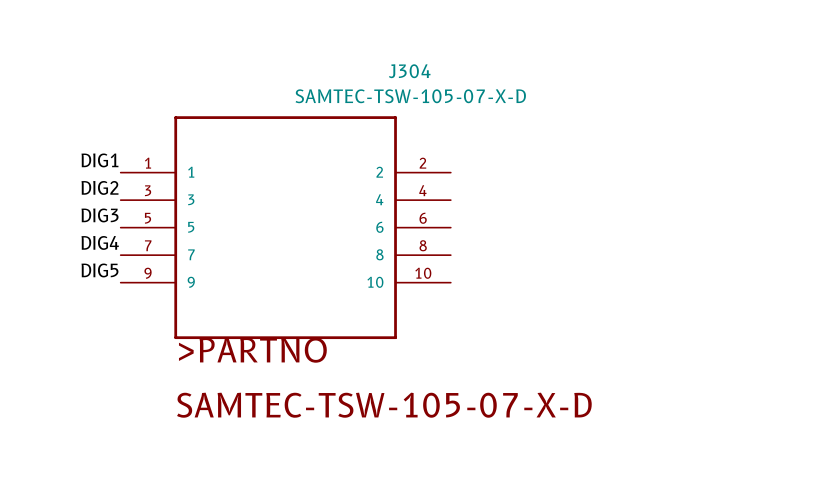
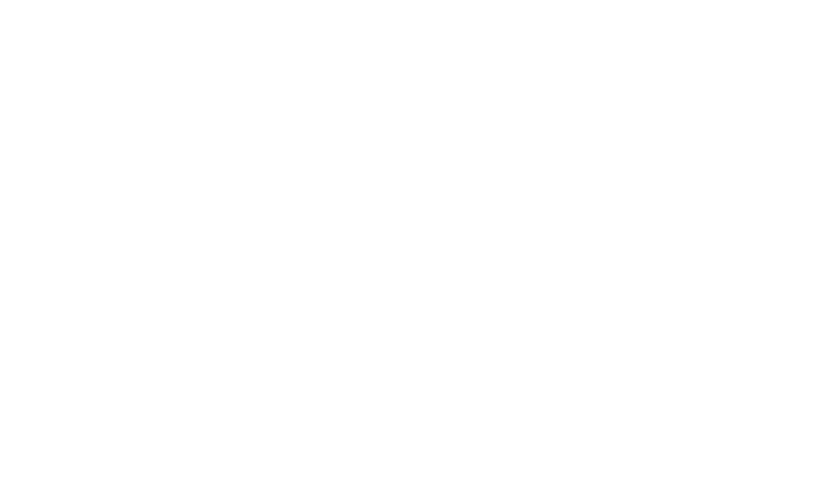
label: DIG1 (99, 160) -> none
label: DIG2 (100, 187) -> none
label: DIG3 (100, 215) -> none
J304: SAMTEC-TSW-105-07-X-D (285, 227) -> none
label: DIG4 (100, 242) -> none
label: DIG5 (99, 270) -> none

